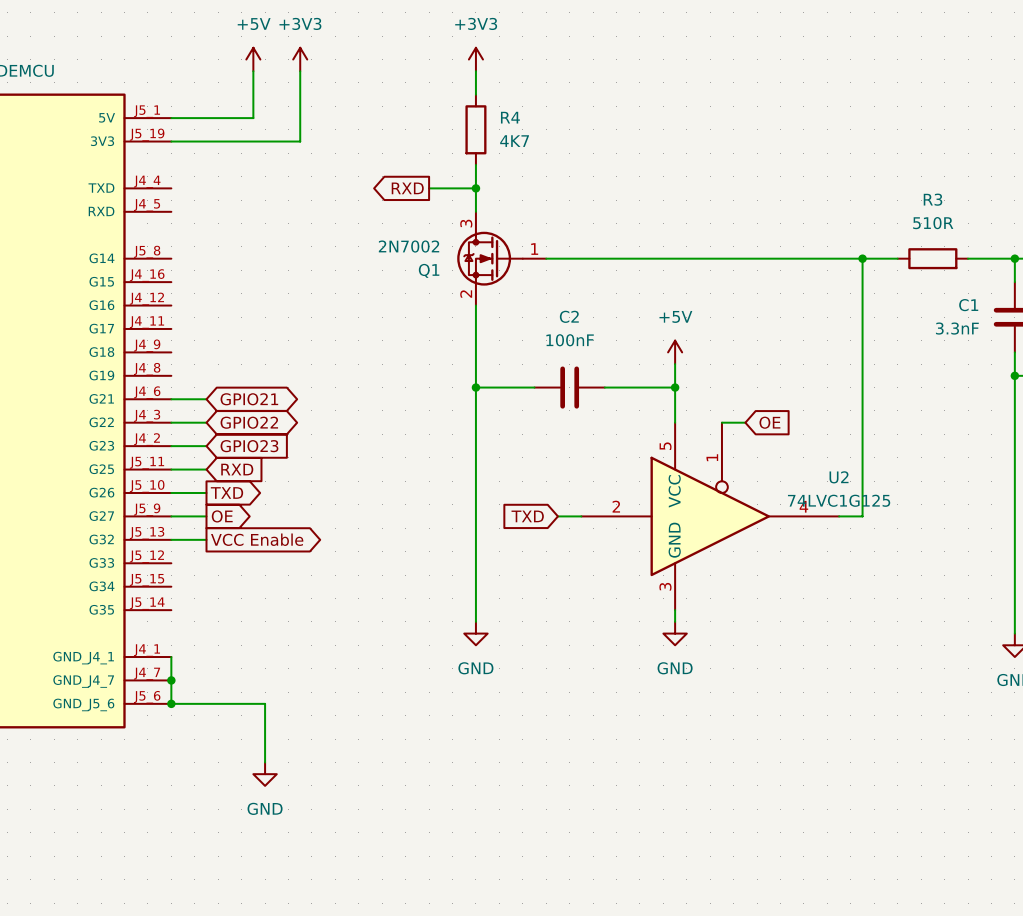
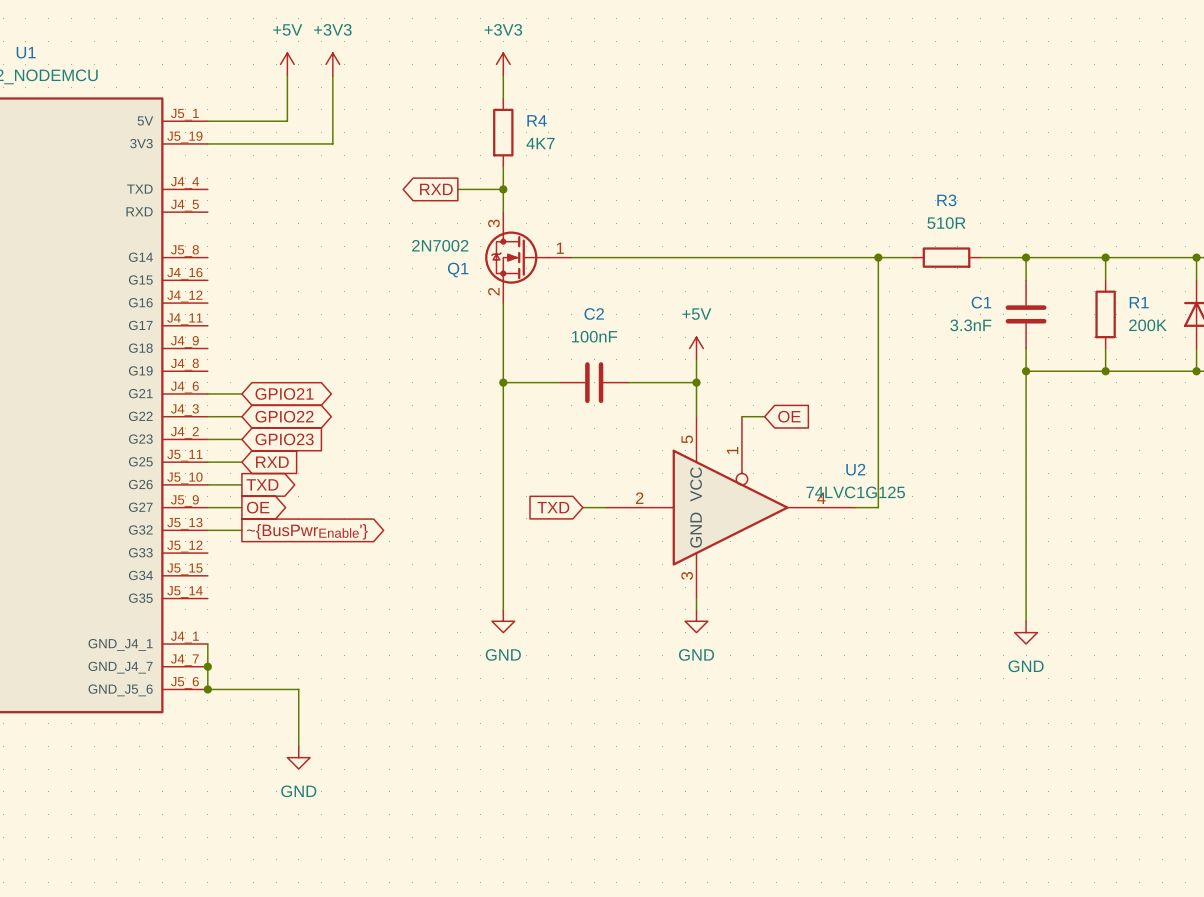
global label: VCC Enable (257, 539) -> ~{BusPwrEnable'} (307, 531)

